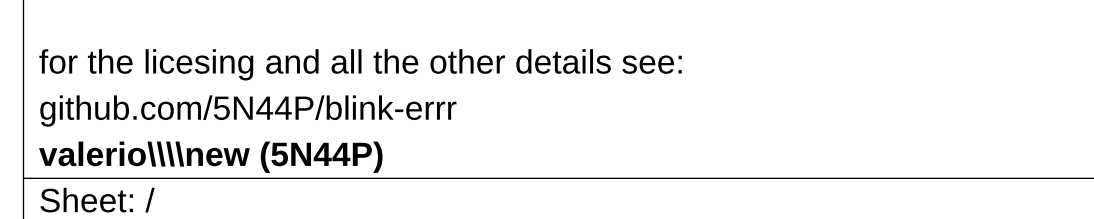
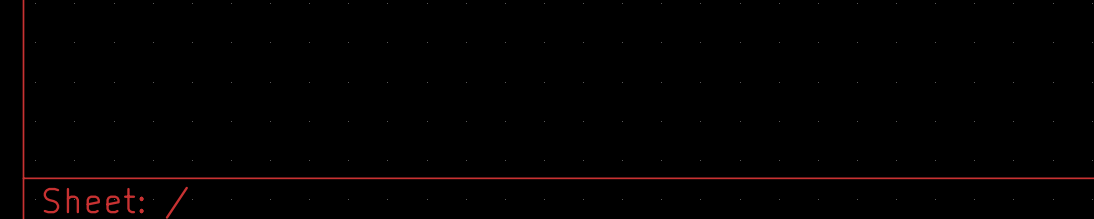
title block: for the licesing and all the other details see: (360, 64) -> none
title block: github.com/5N44P/blink-errr (248, 111) -> none
title block: valerio\\\\new (5N44P) (210, 157) -> none

